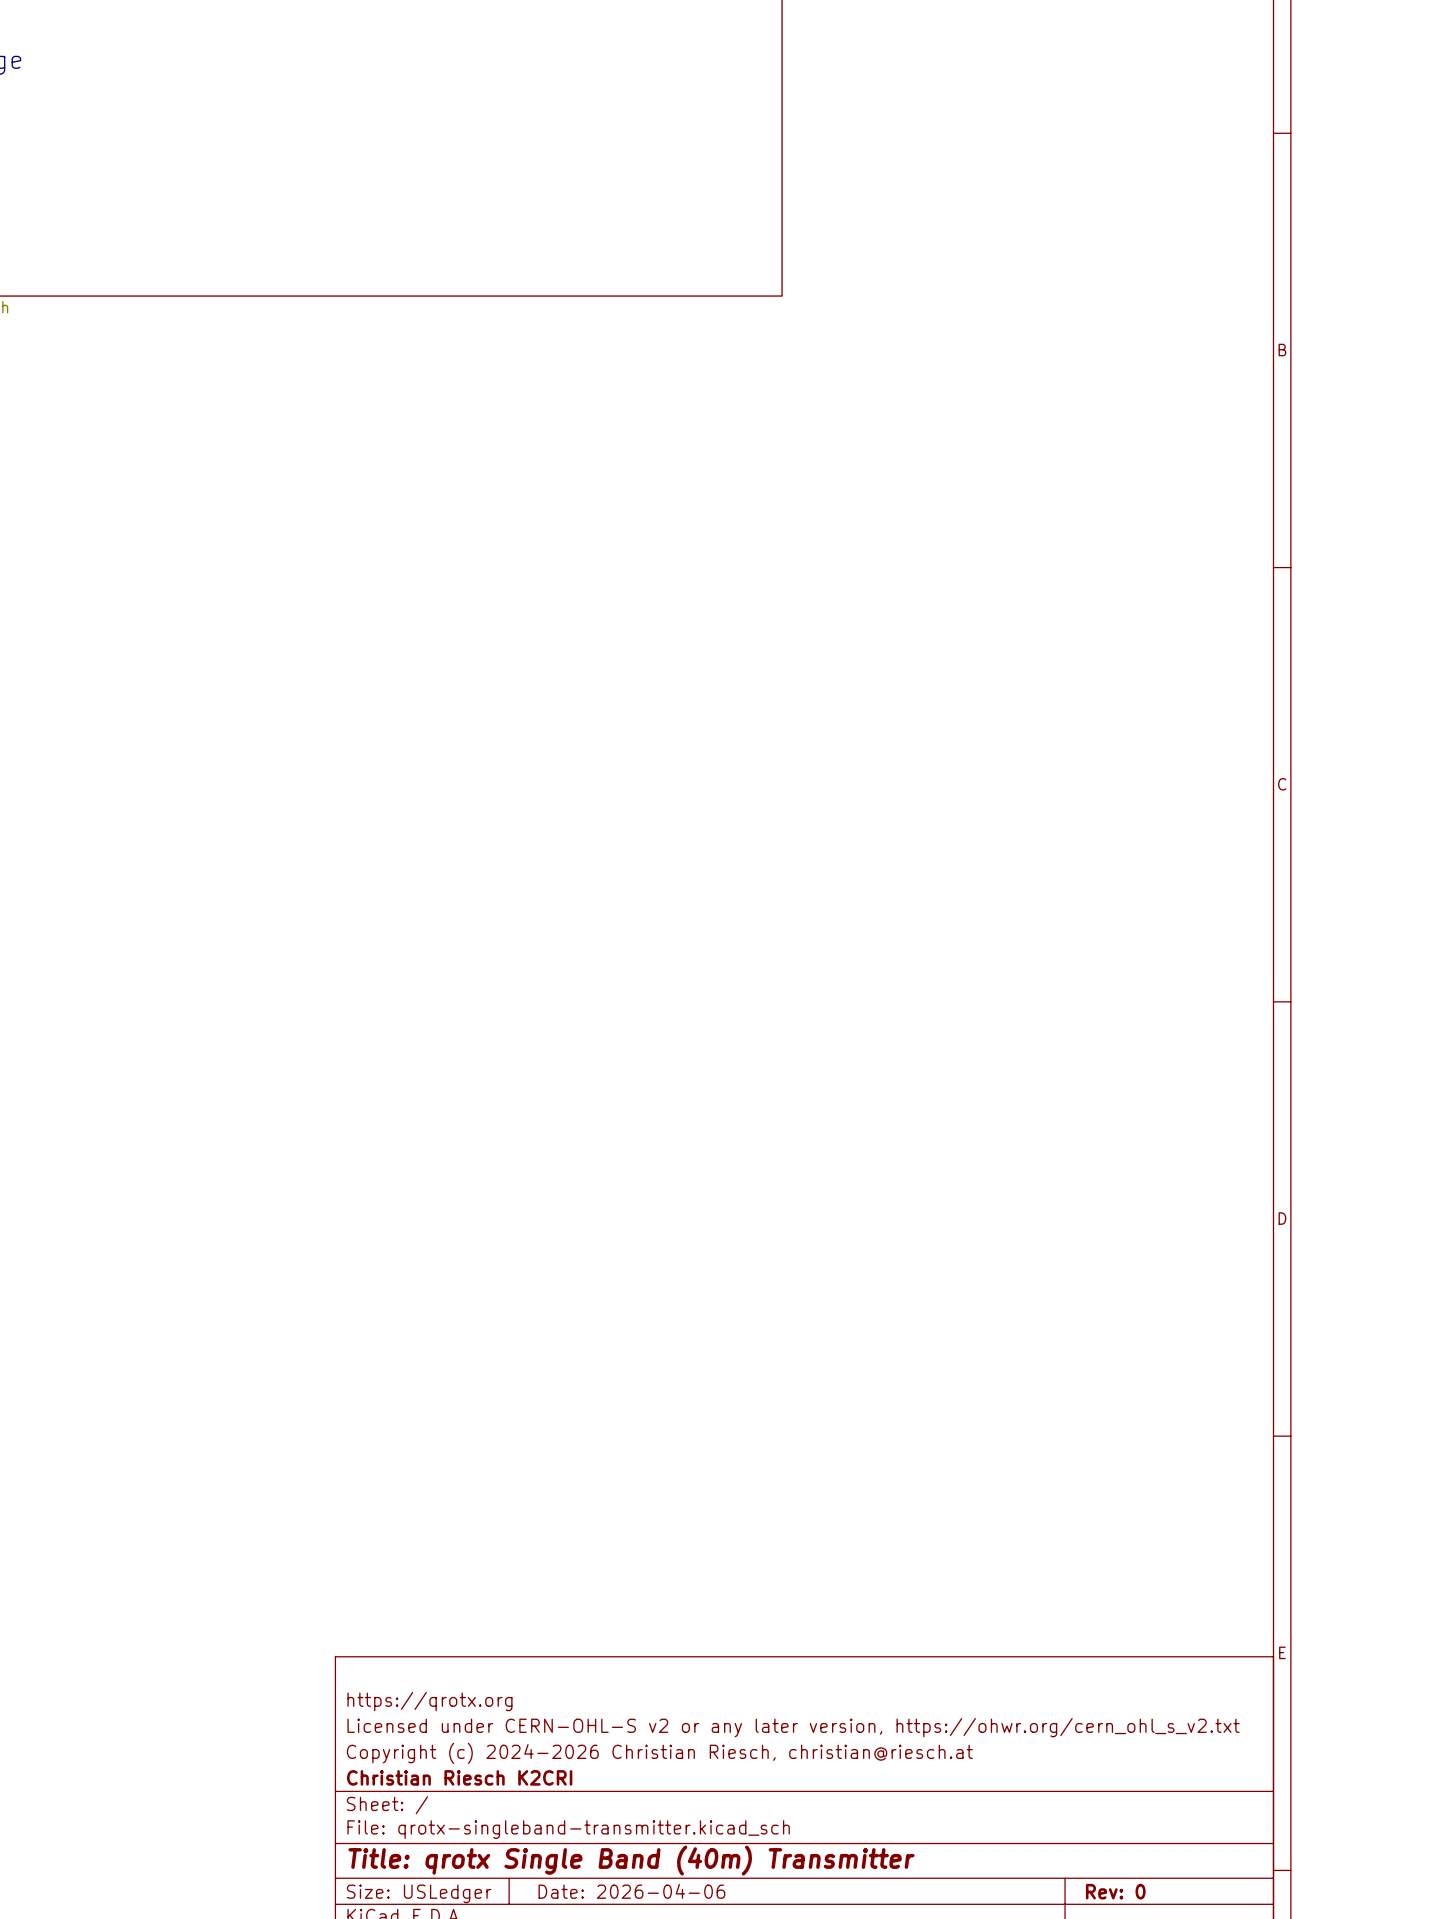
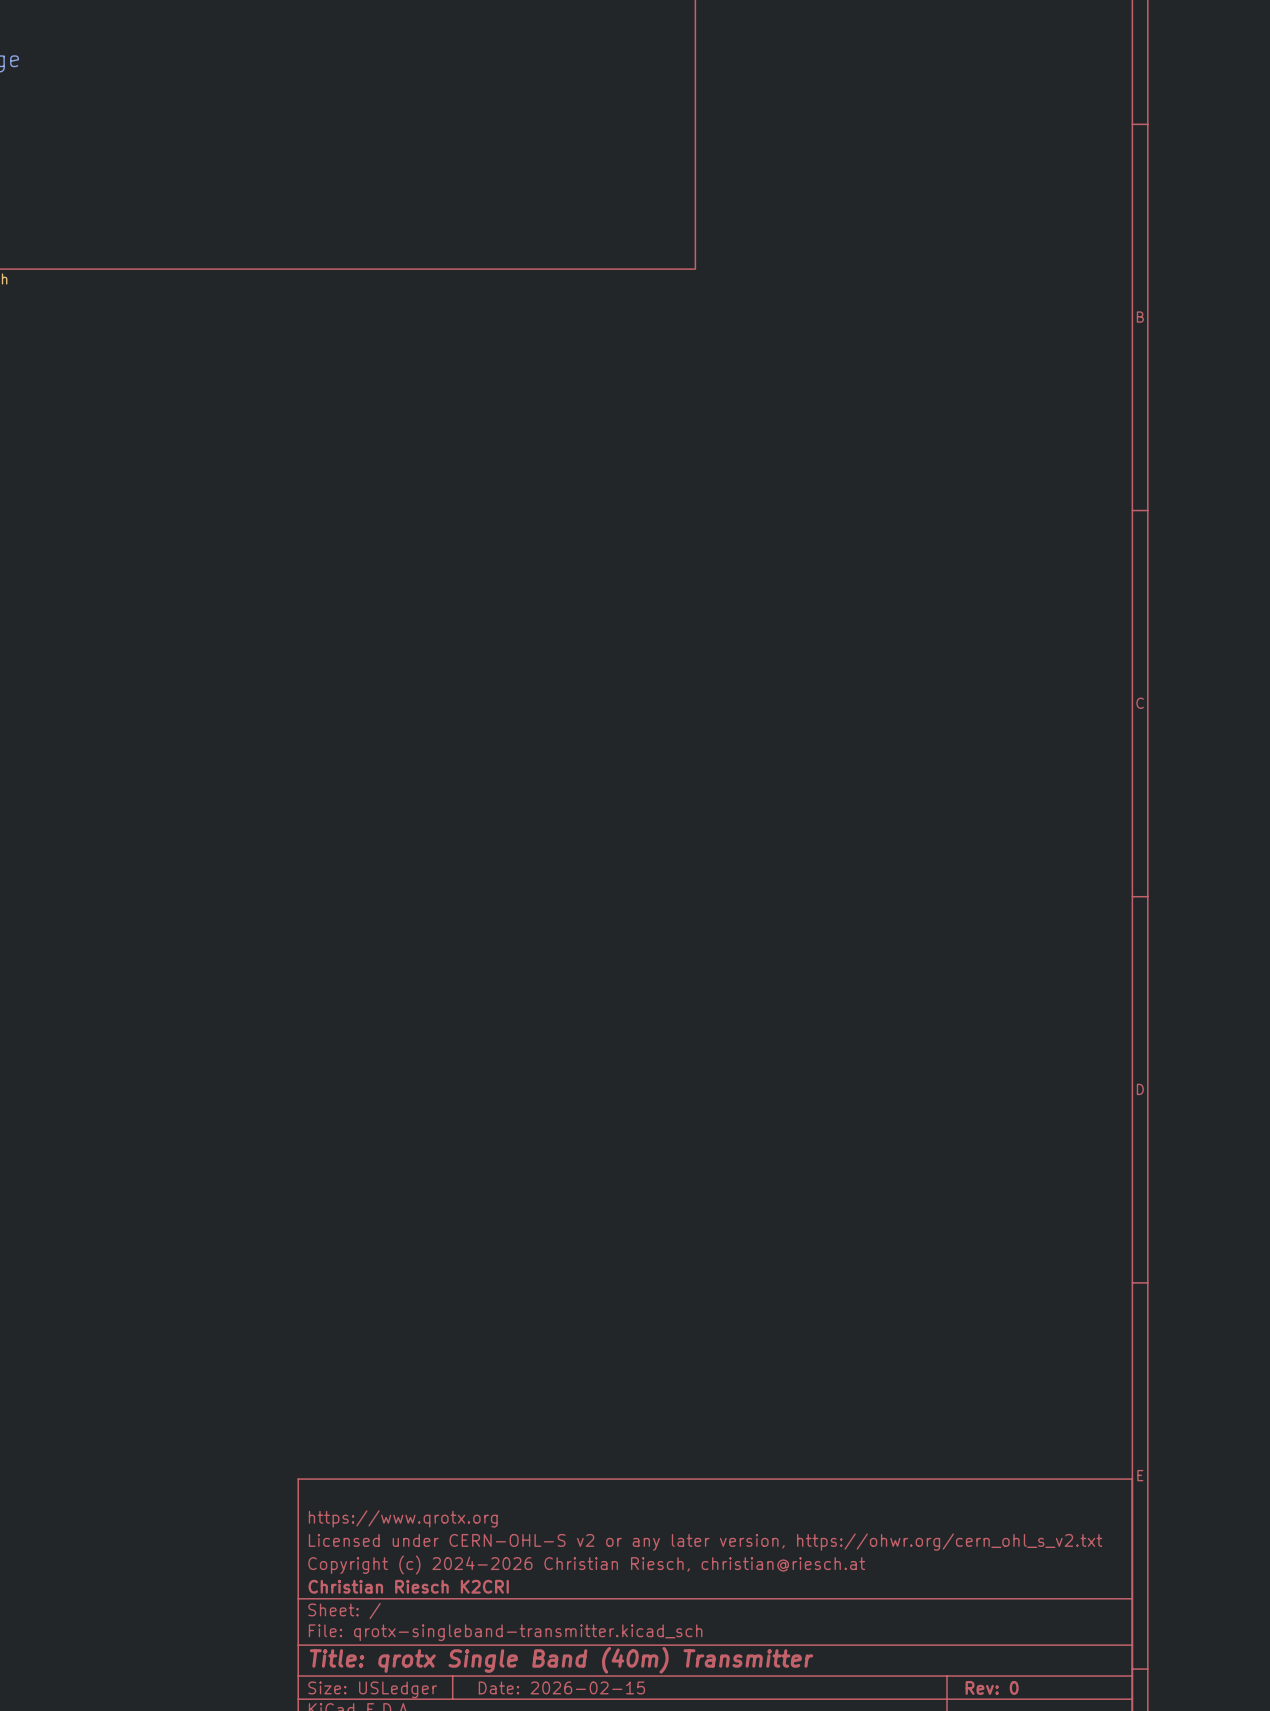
title block: https://qrotx.org (429, 1701) -> https://www.qrotx.org (403, 1518)
title block: Date: 2026-04-06 (631, 1891) -> Date: 2026-02-15 (561, 1687)

